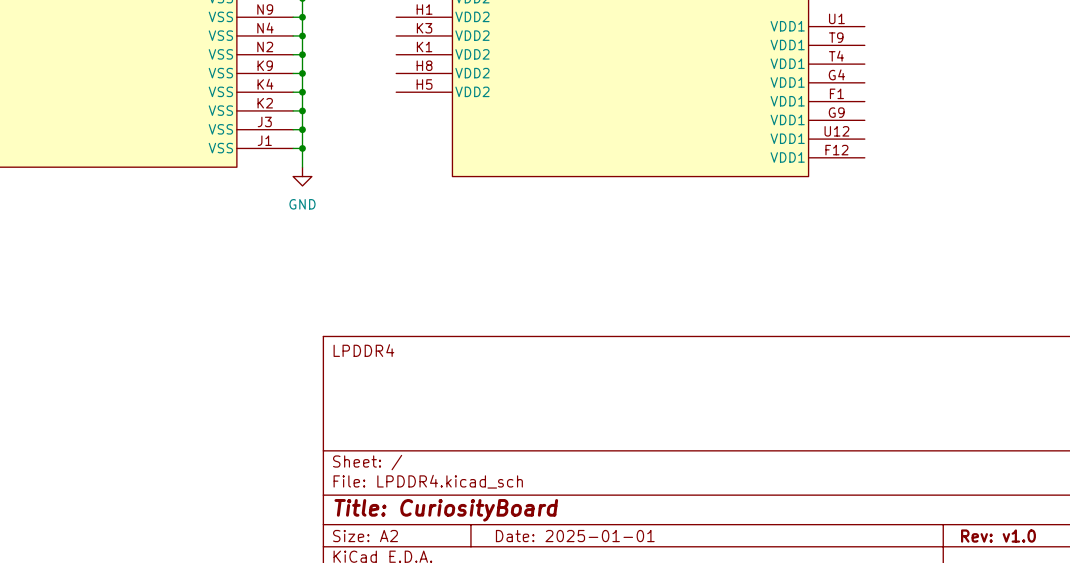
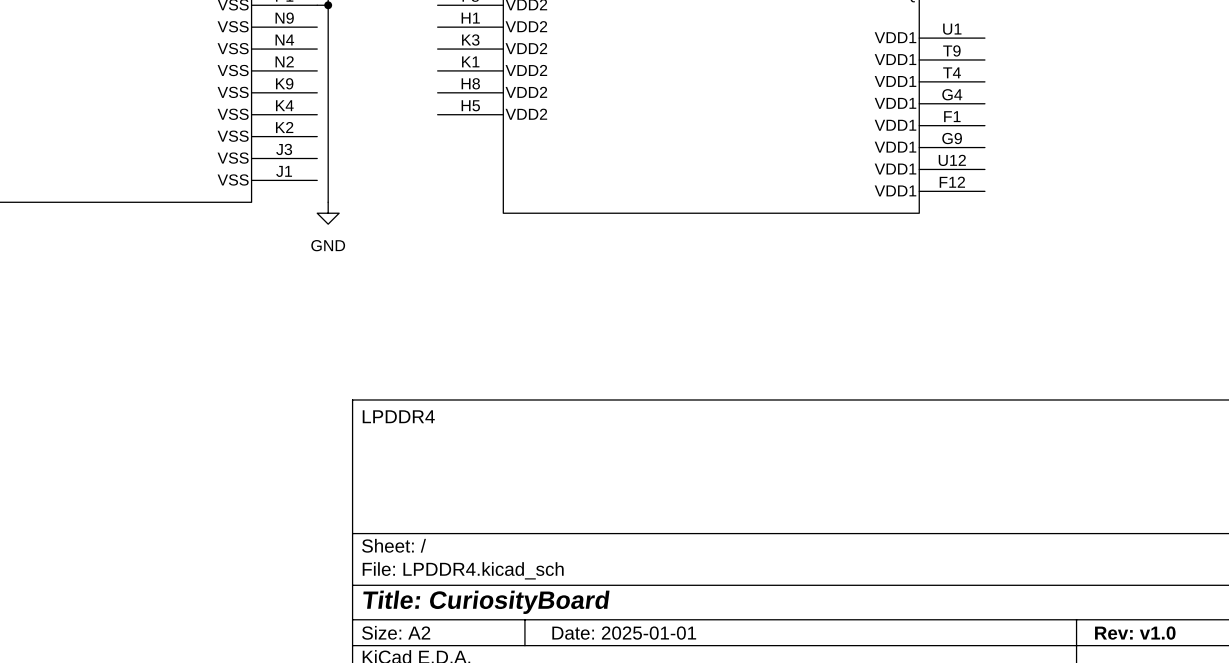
wire: (293, 17) (302, 17) -> none
junction: (302, 17) -> none
wire: (293, 35) (302, 35) -> none
junction: (302, 35) -> none
wire: (293, 54) (302, 54) -> none
junction: (302, 54) -> none
wire: (293, 73) (302, 73) -> none
junction: (302, 73) -> none
wire: (293, 92) (302, 92) -> none
junction: (302, 92) -> none
wire: (293, 110) (302, 110) -> none
junction: (302, 110) -> none
wire: (293, 129) (302, 129) -> none
junction: (302, 129) -> none
wire: (293, 148) (302, 148) -> none
junction: (302, 148) -> none

